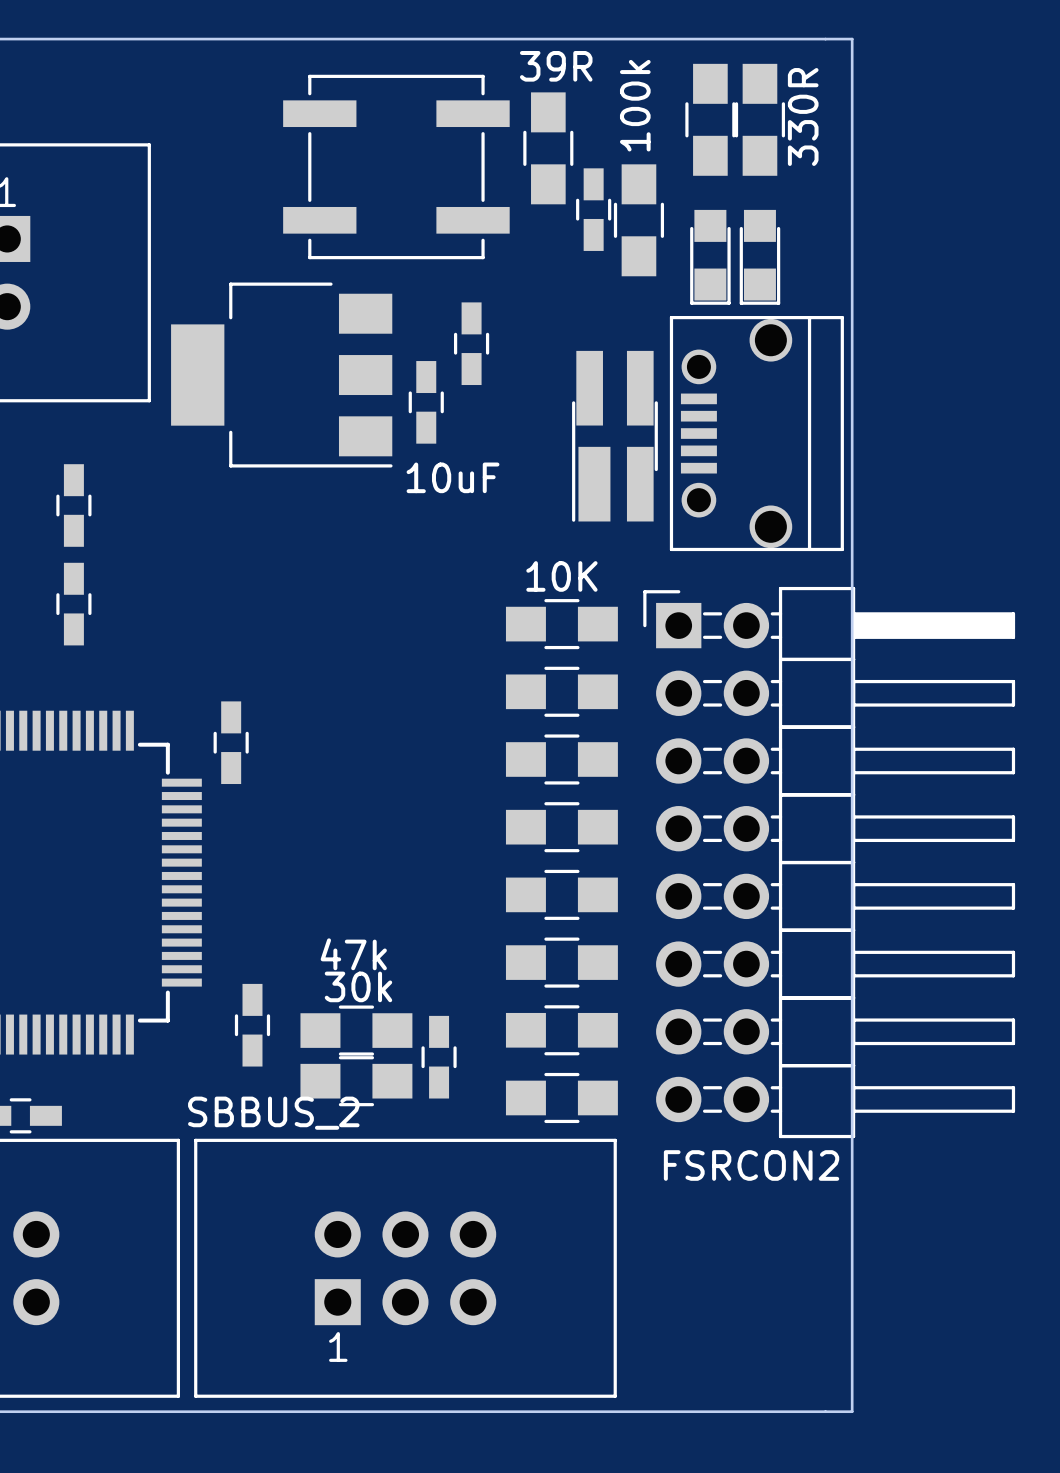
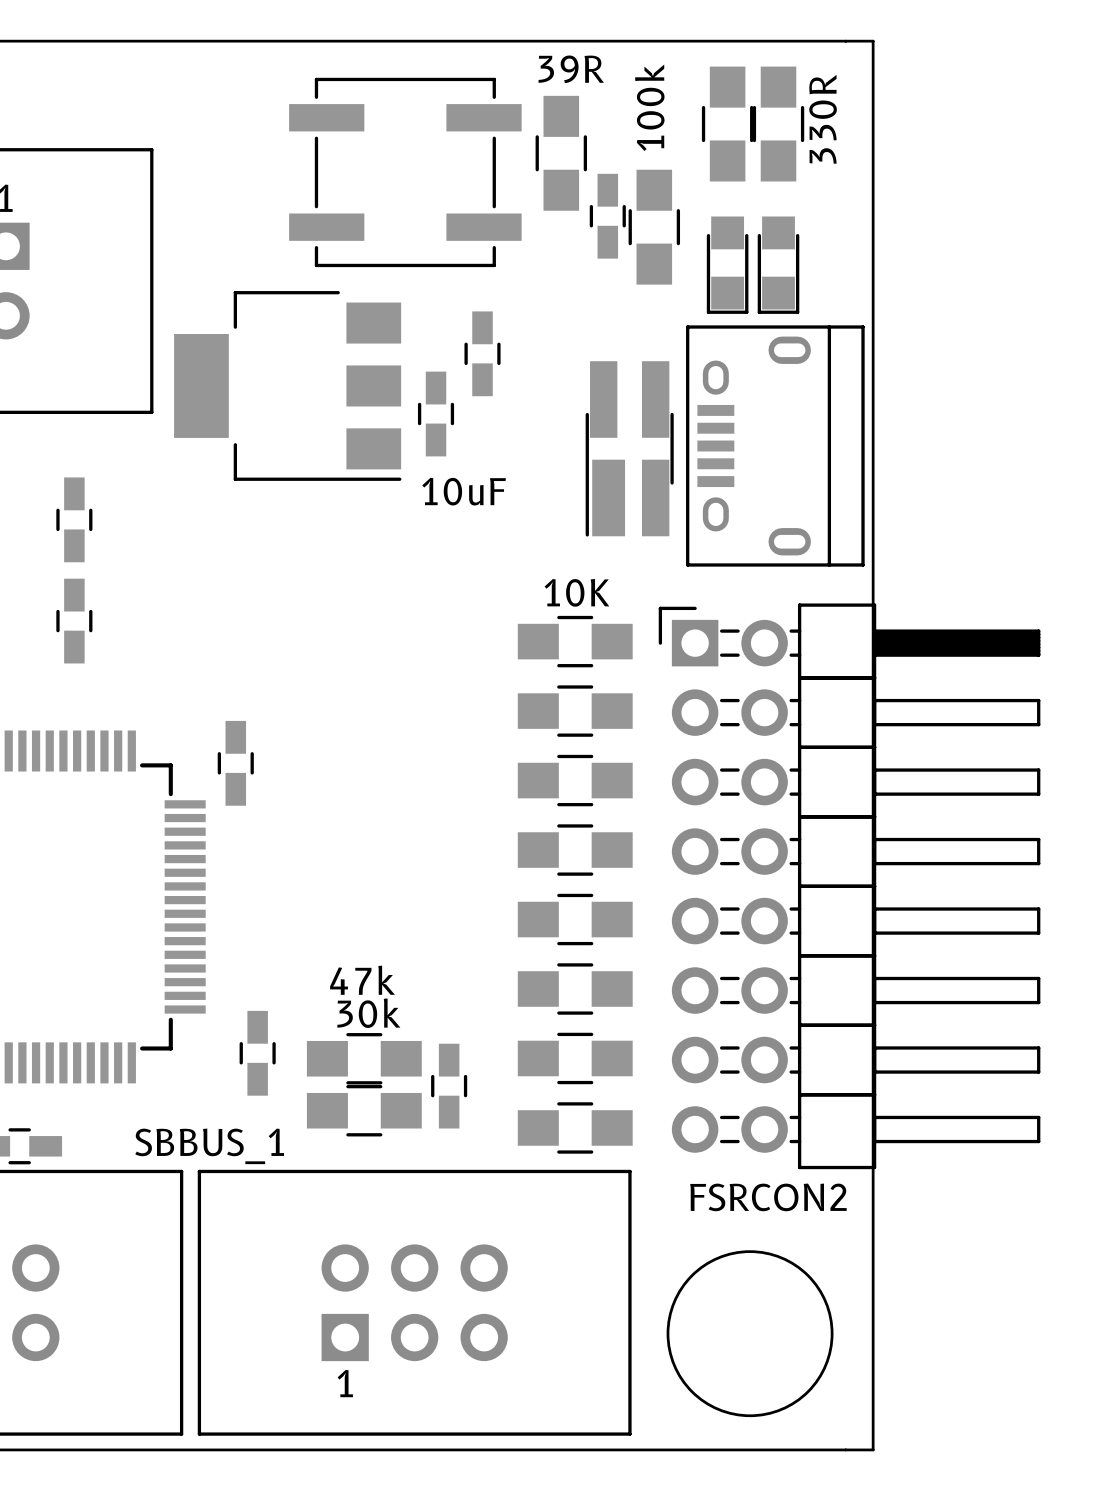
part footprint: [669, 315, 844, 552] -> [686, 325, 865, 567]
part value: SBBUS_2 (273, 1113) -> SBBUS_1 (209, 1146)
round board edge: none -> [666, 1250, 834, 1418]

